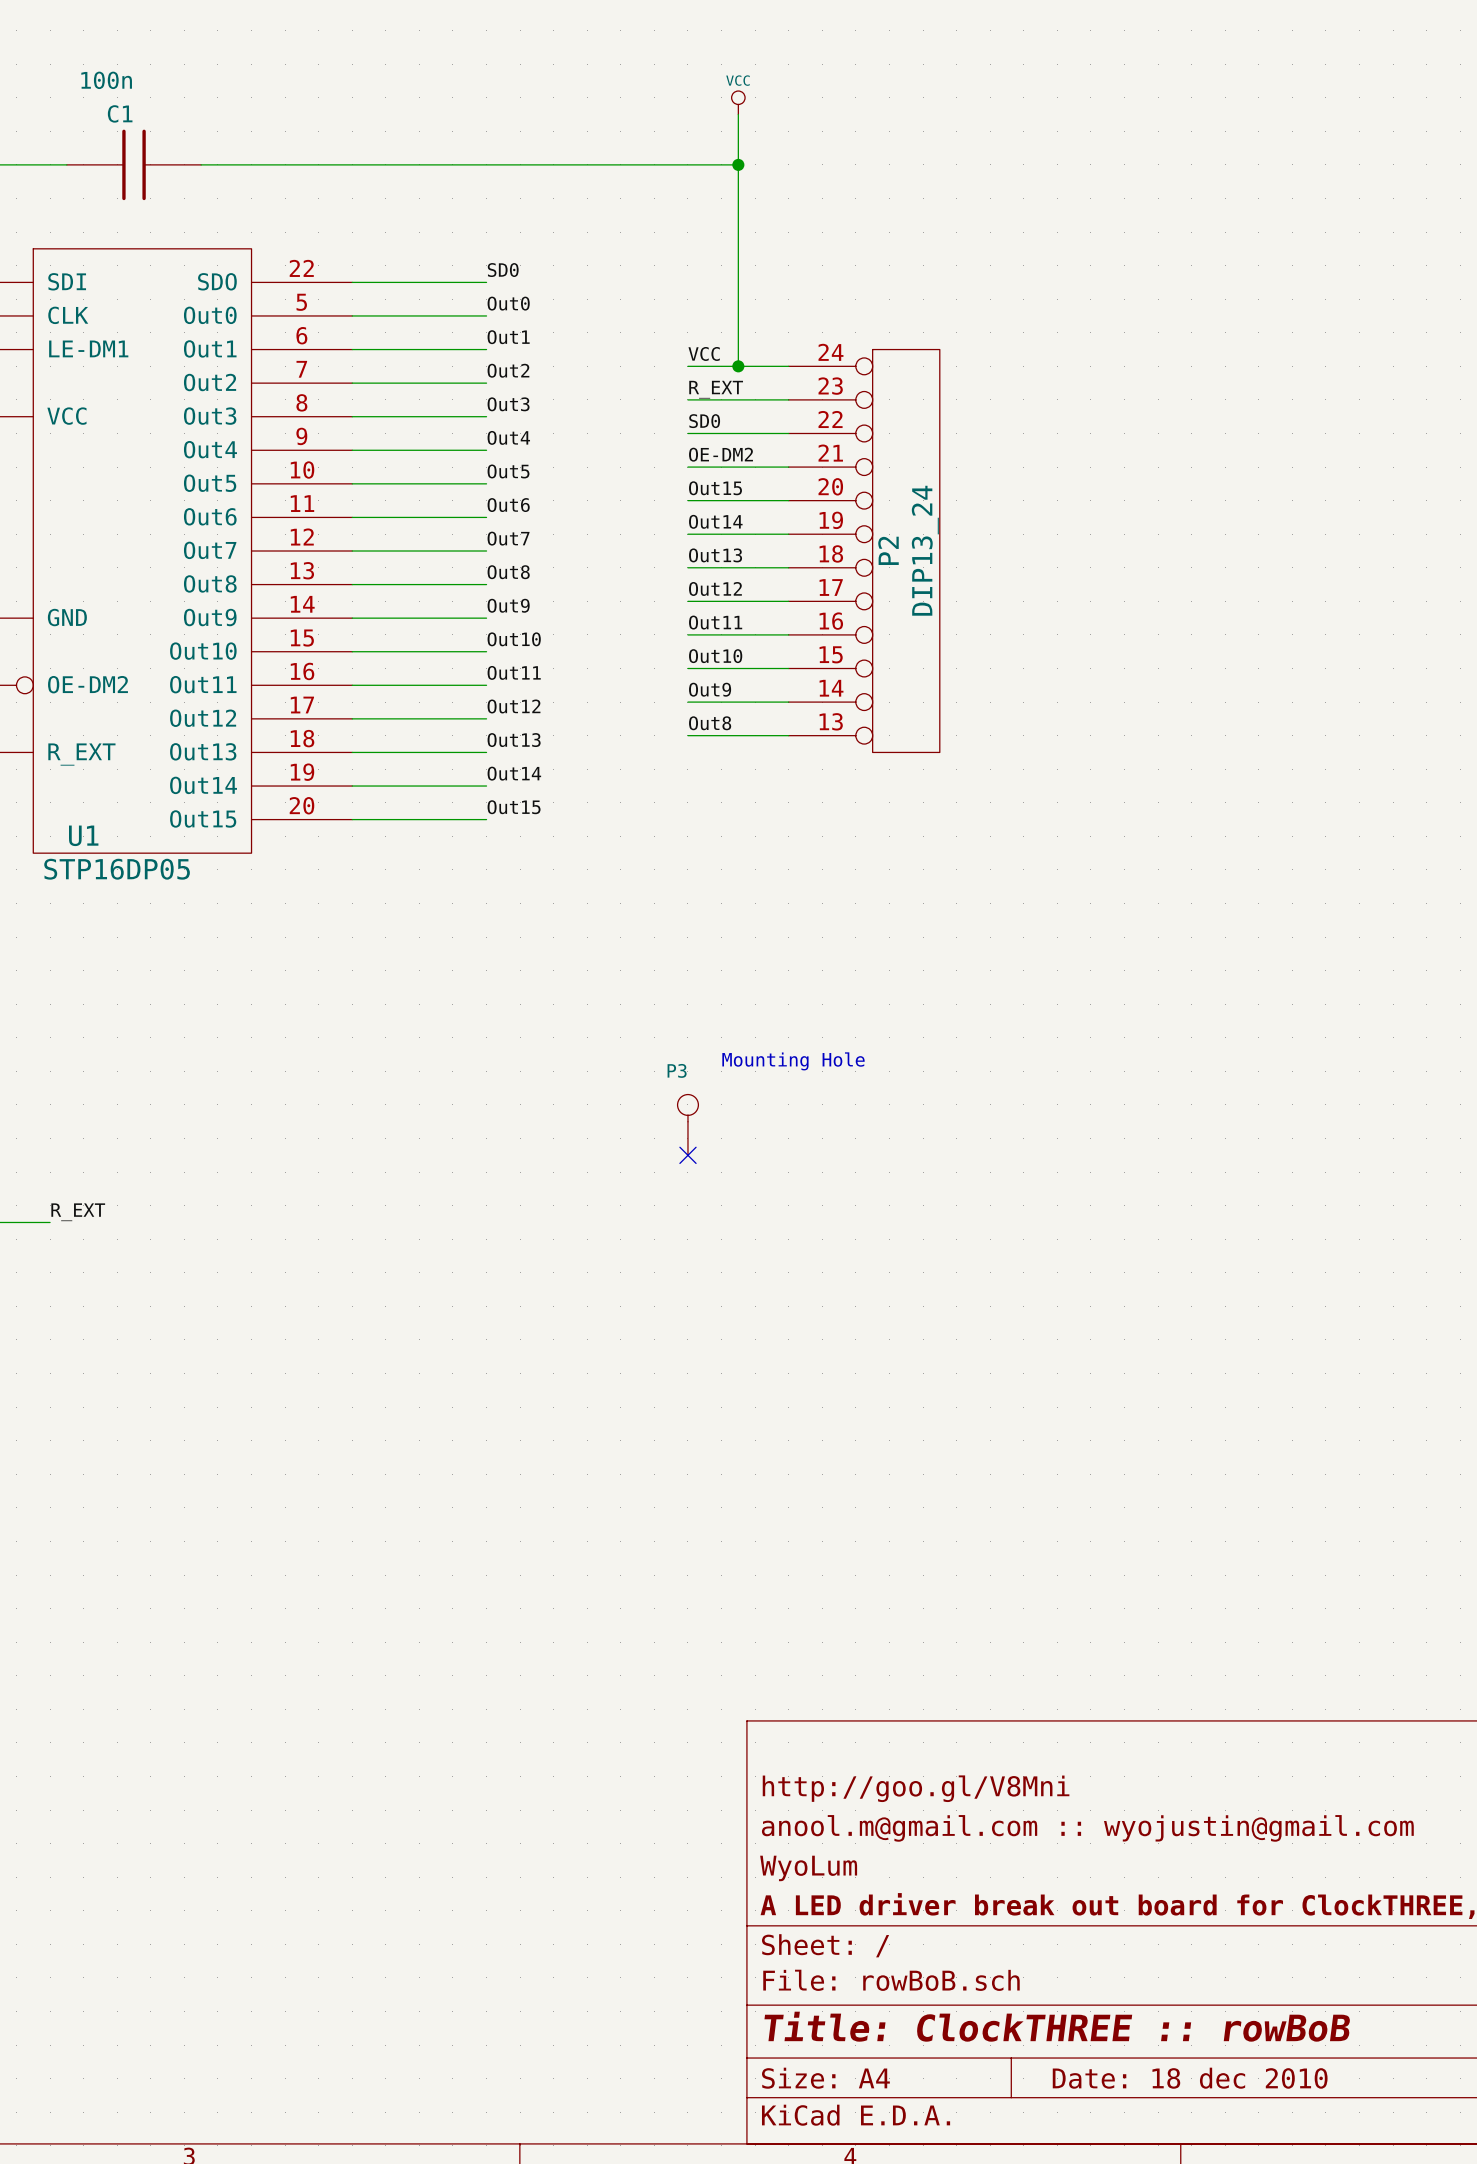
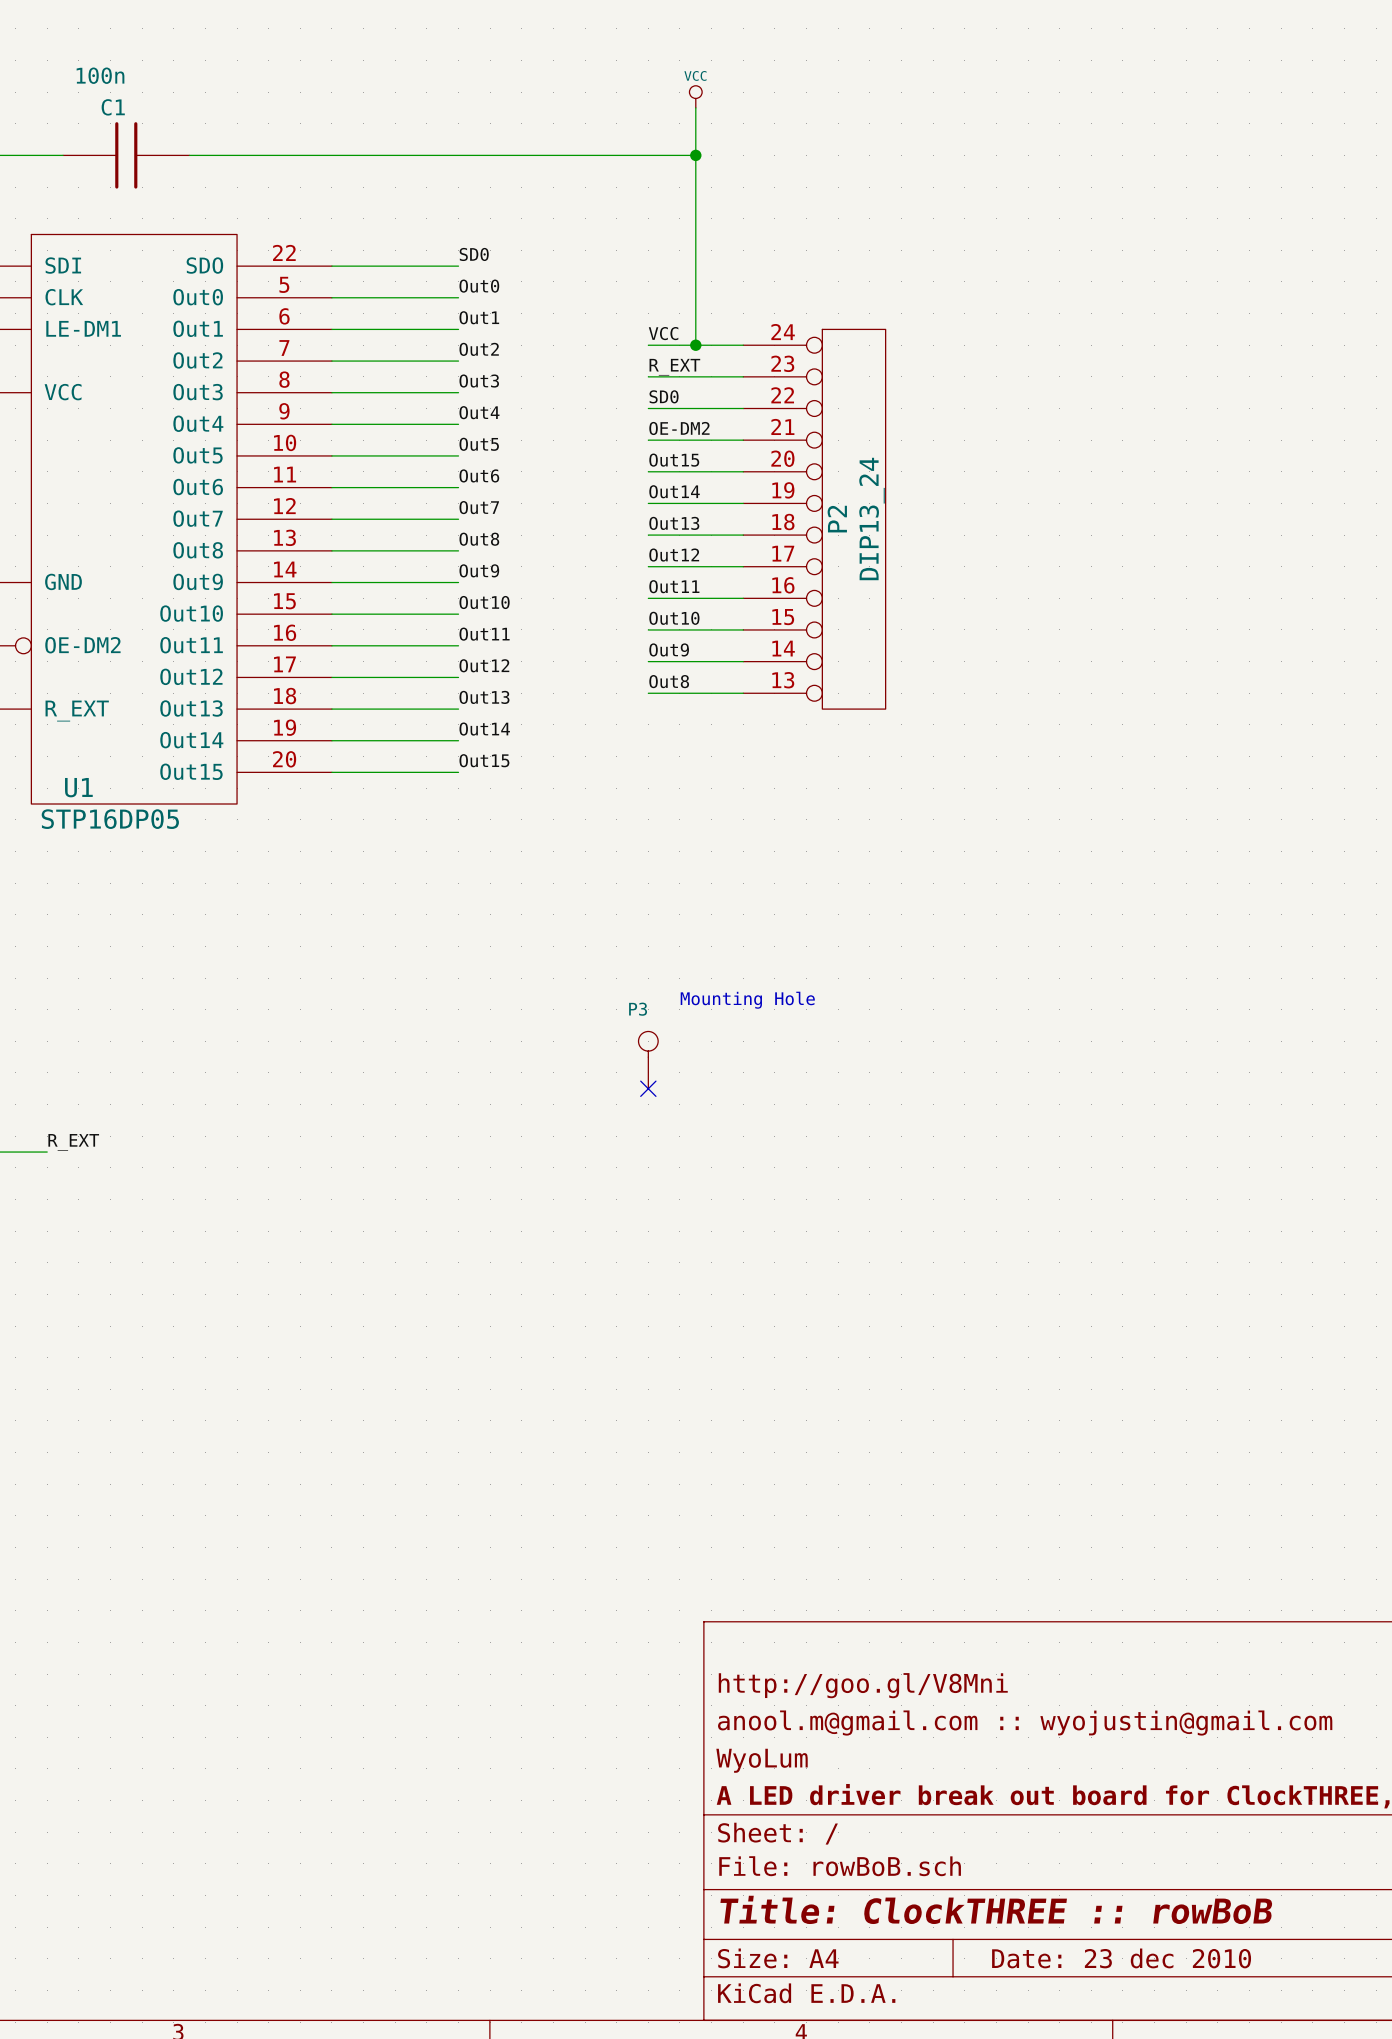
title block: Date: 18 dec 2010 (1190, 2078) -> Date: 23 dec 2010 (1121, 1958)

